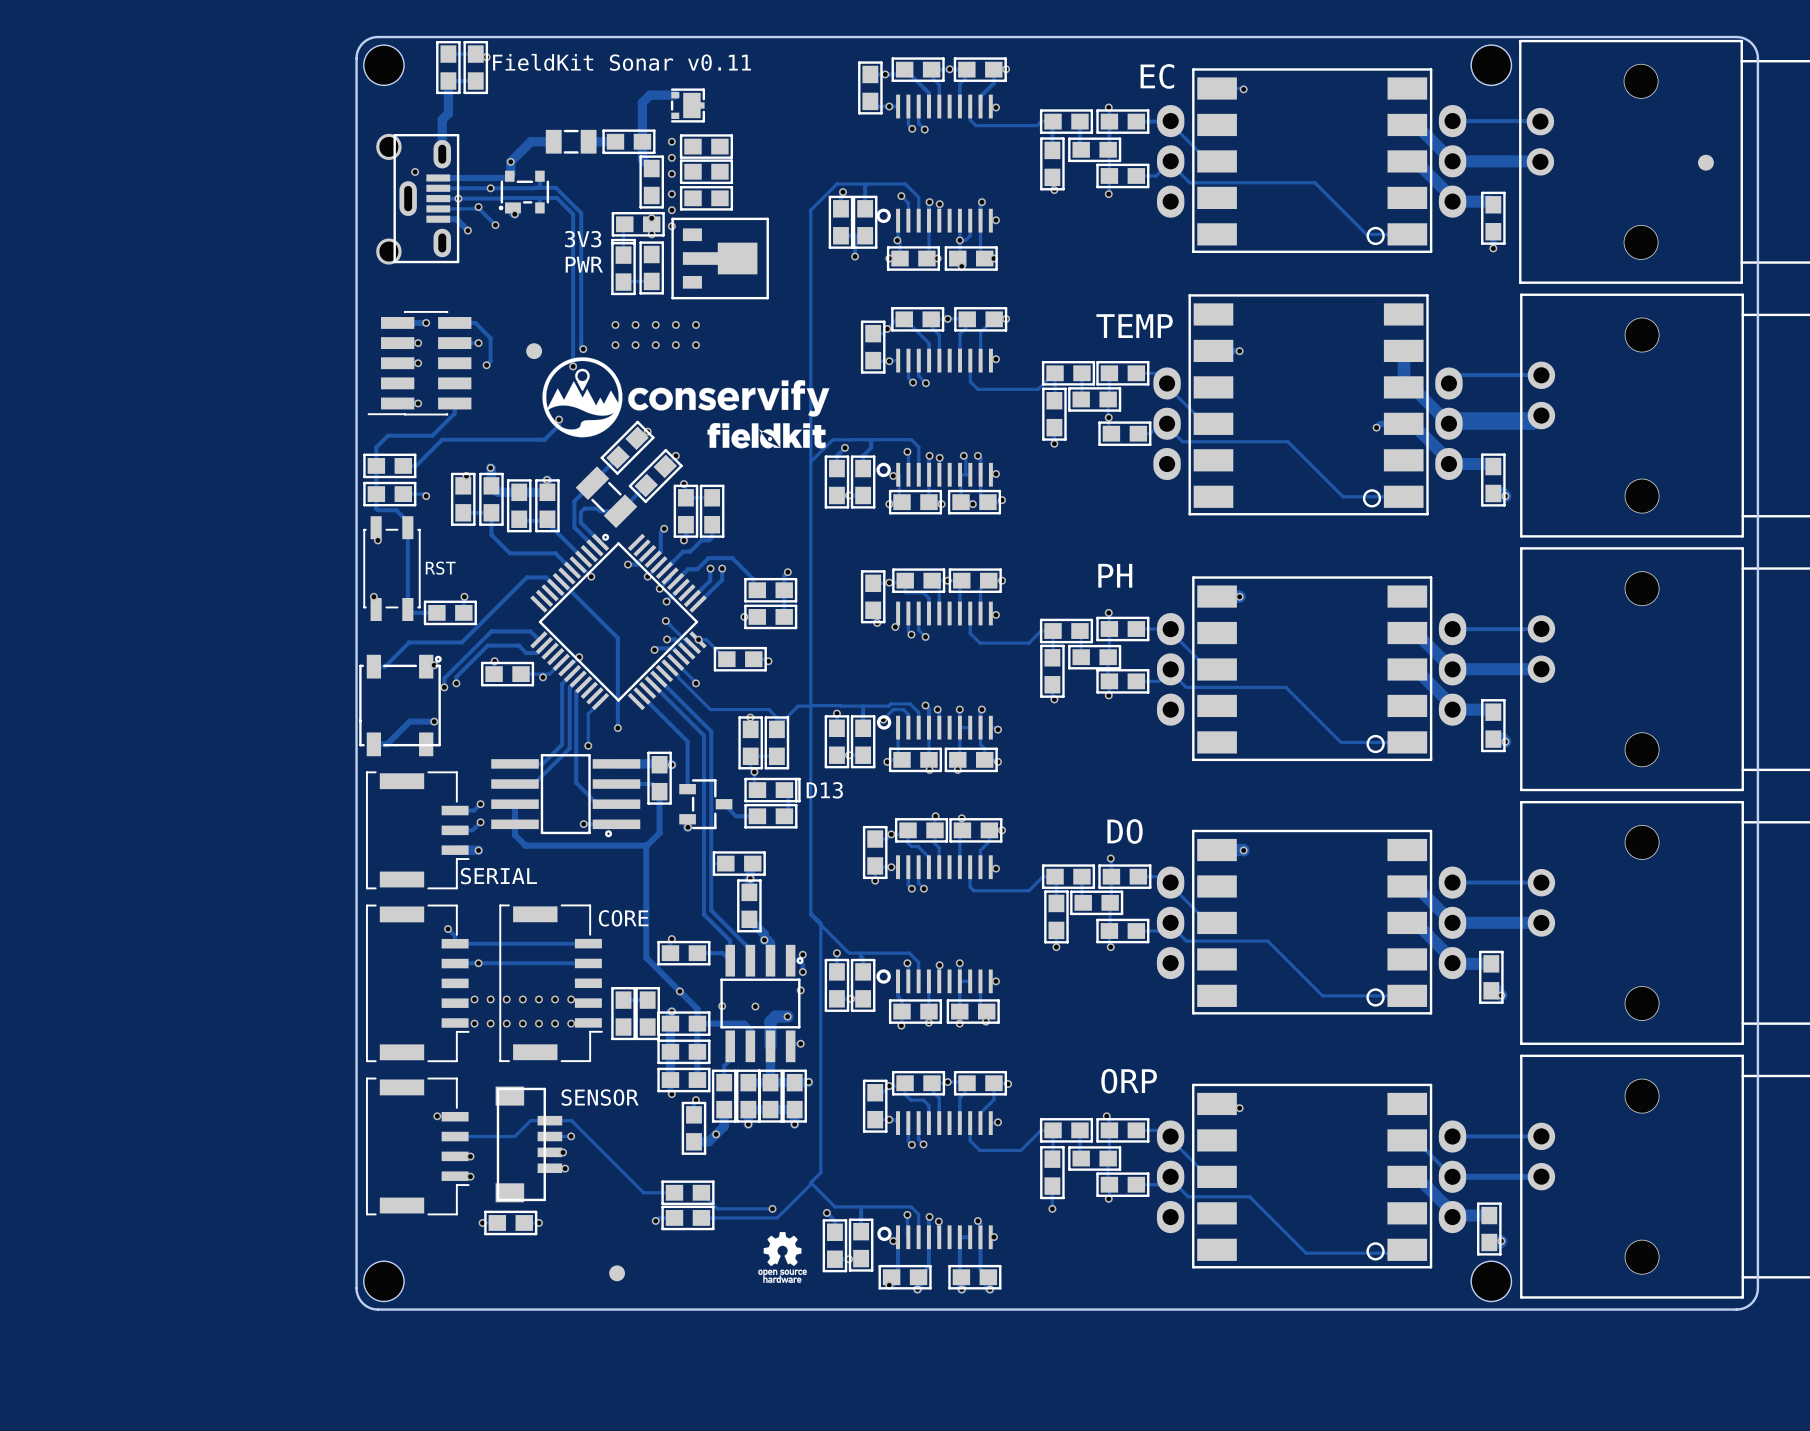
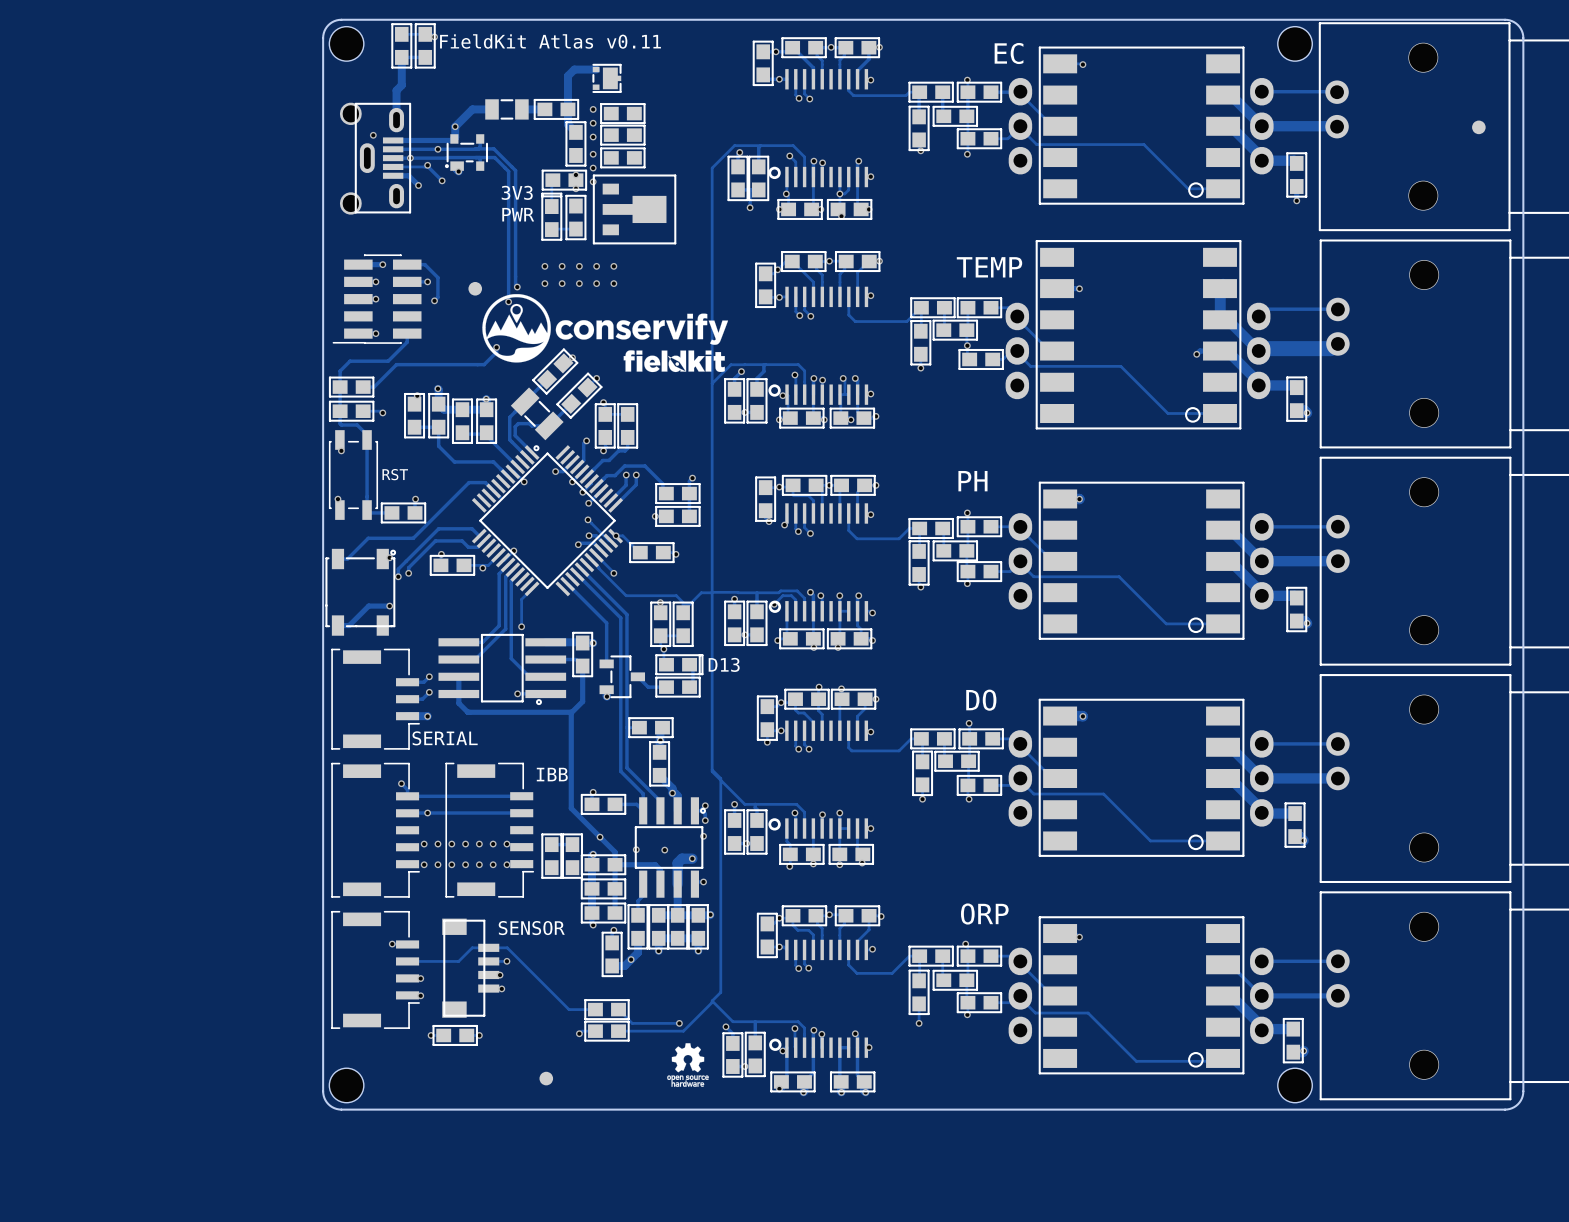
text: FieldKit Sonar v0.11 (622, 62) -> FieldKit Atlas v0.11 (550, 41)
track: (561, 581) (617, 638) (617, 728) -> none
via: (617, 728) -> none
text: CORE (623, 918) -> IBB (552, 774)

